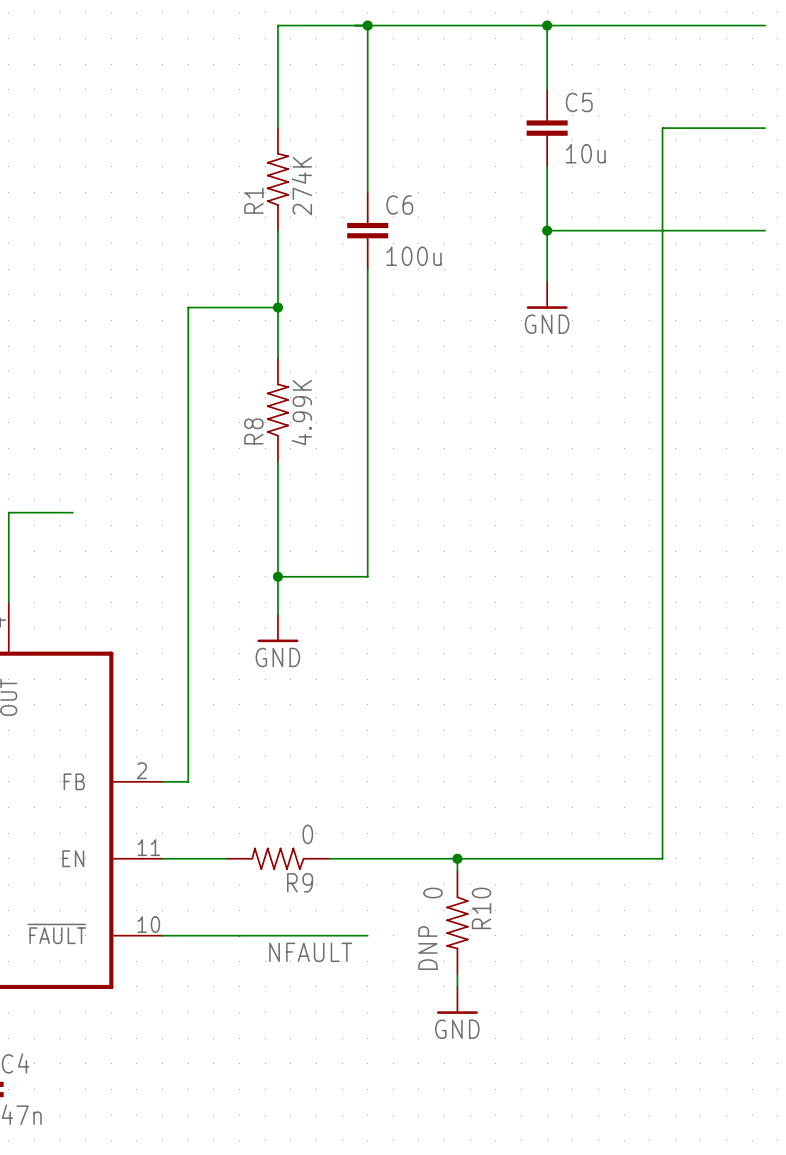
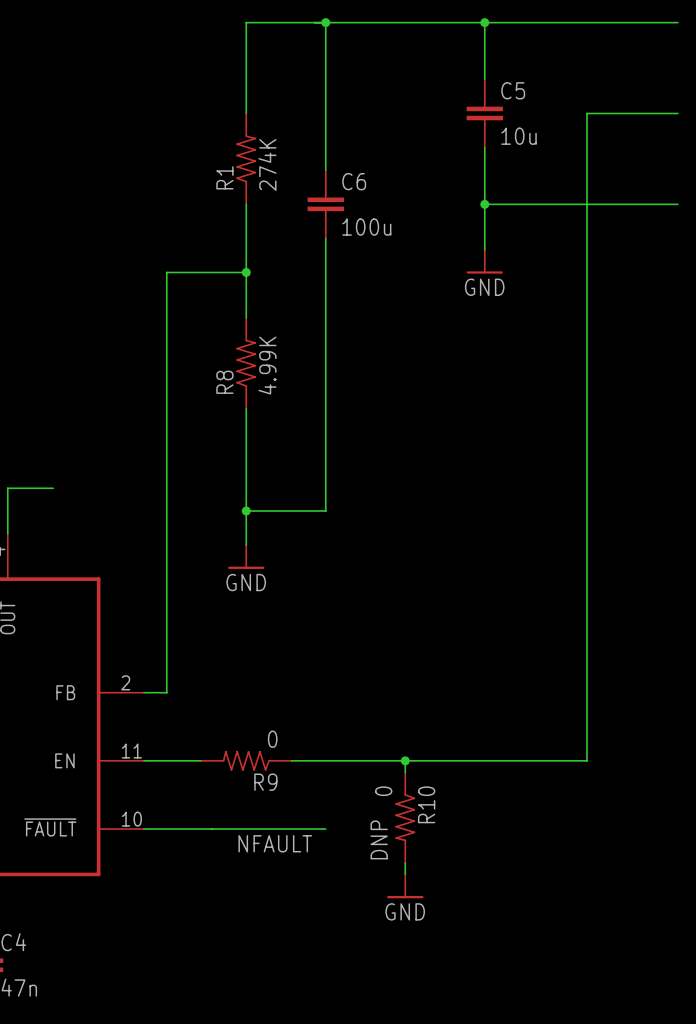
wire: (72, 512) (8, 512) (8, 551) -> (53, 488) (7, 488)

